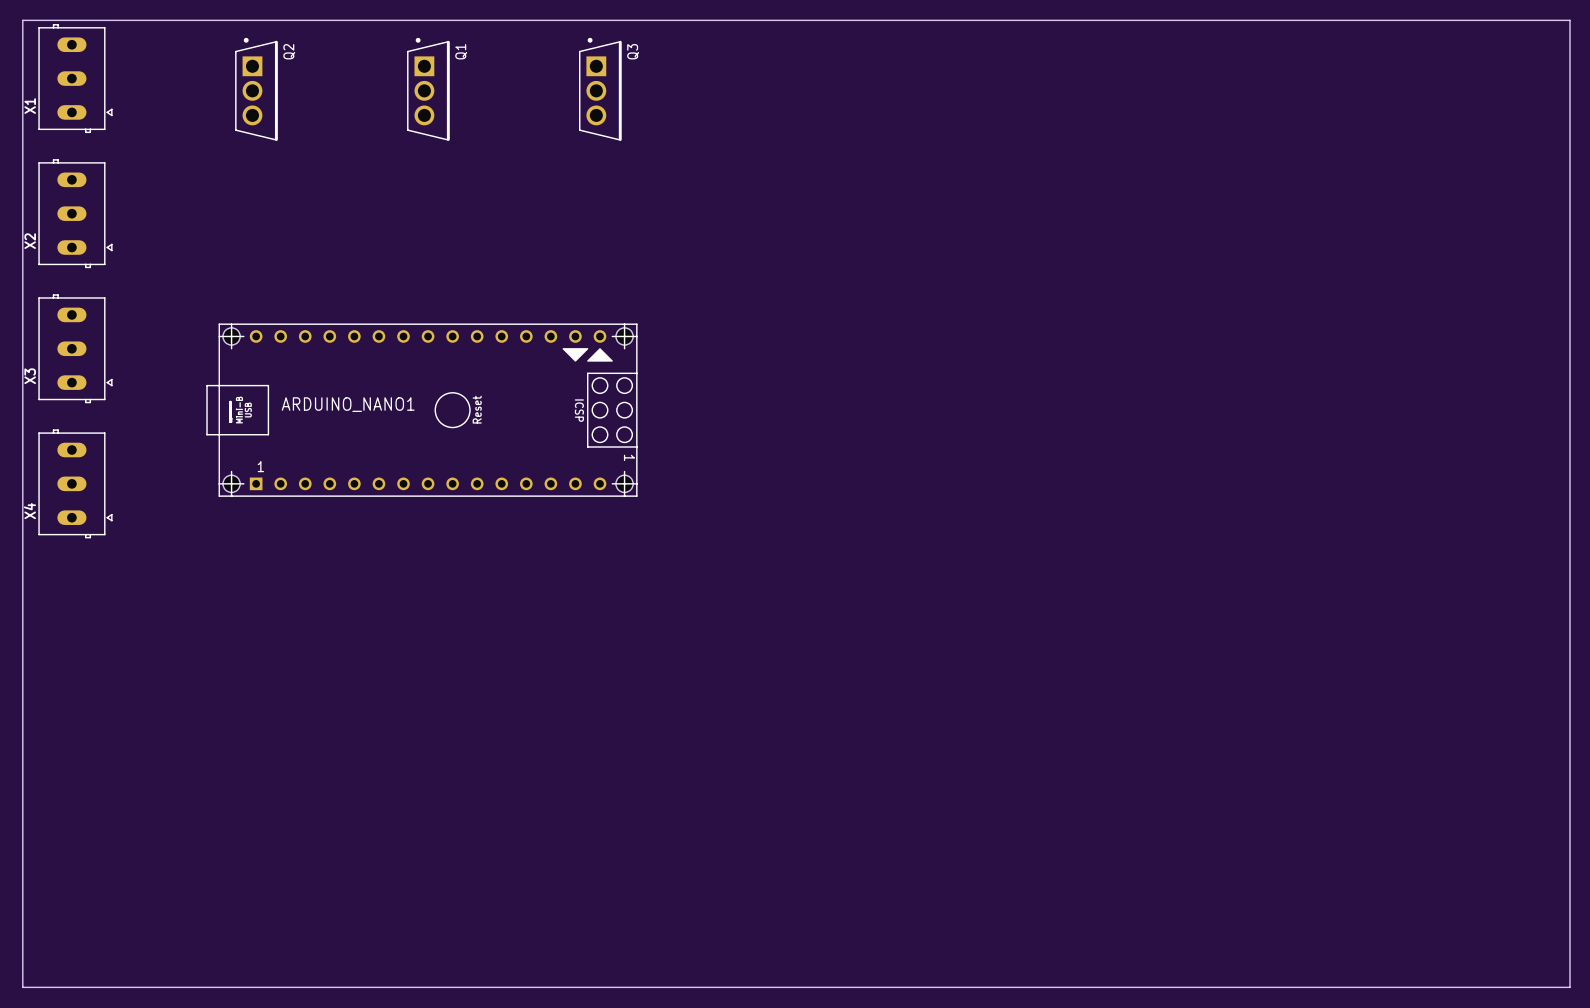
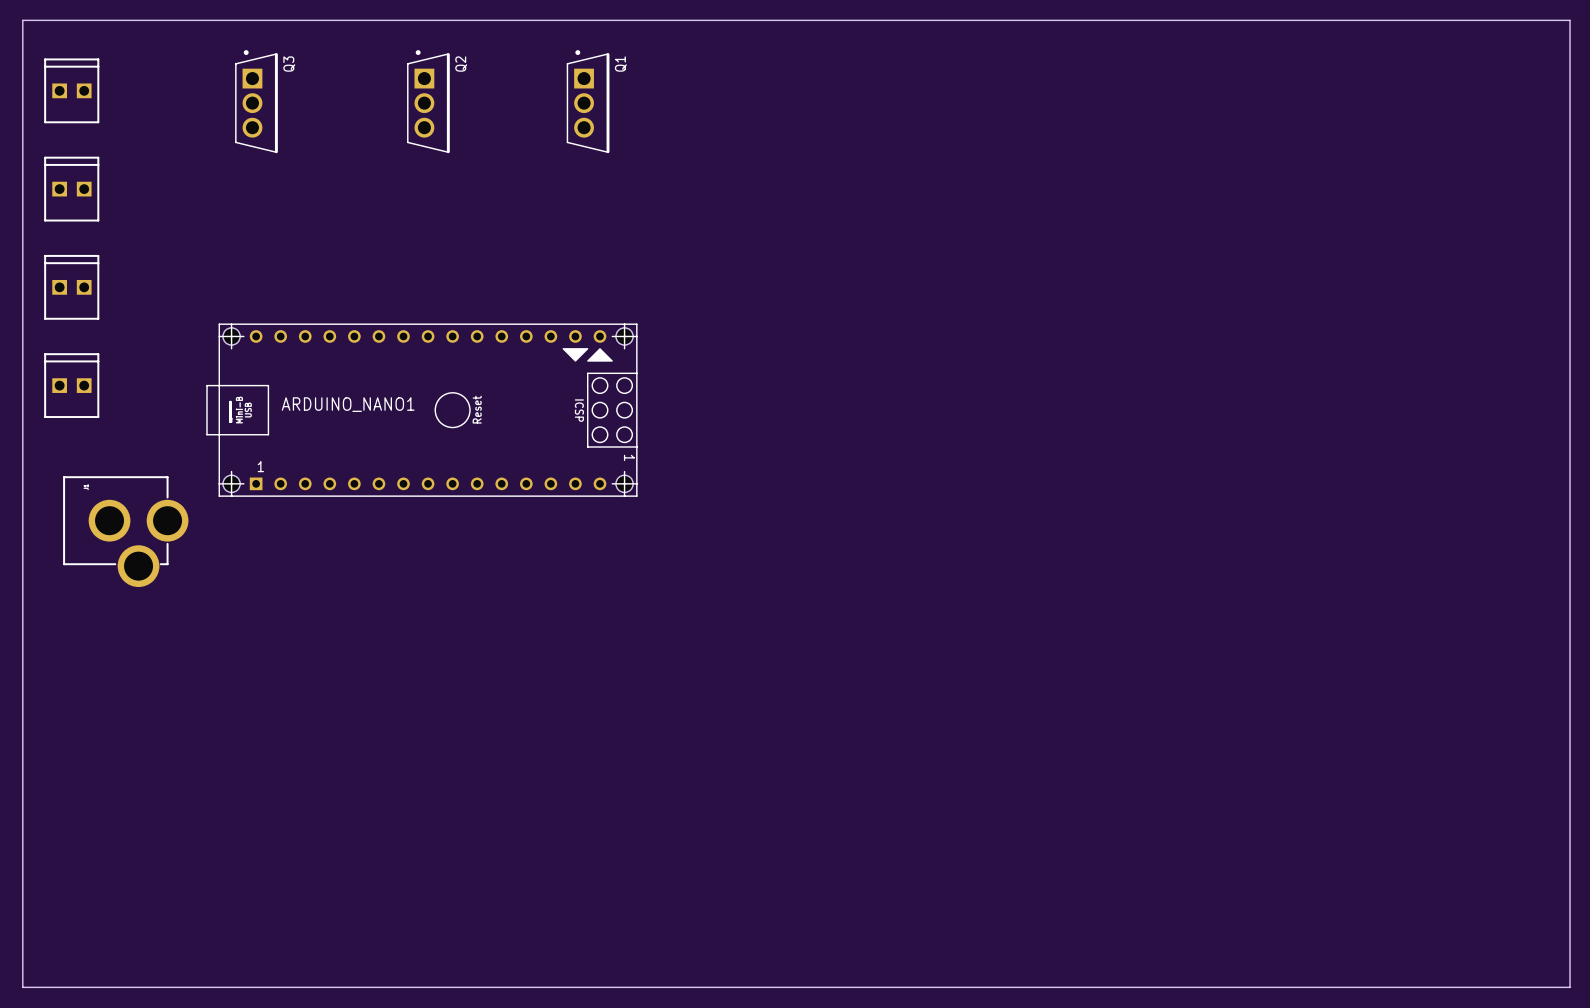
X1: (75, 78) -> none
Q2 position: (256, 89) -> (428, 101)
Q1 position: (428, 89) -> (588, 101)
Q3 position: (600, 89) -> (256, 101)
part: none -> (71, 90)
part: none -> (71, 189)
X2: (75, 213) -> none
part: none -> (71, 287)
X3: (75, 348) -> none
part: none -> (71, 385)
X4: (75, 483) -> none
part: none -> (125, 531)

